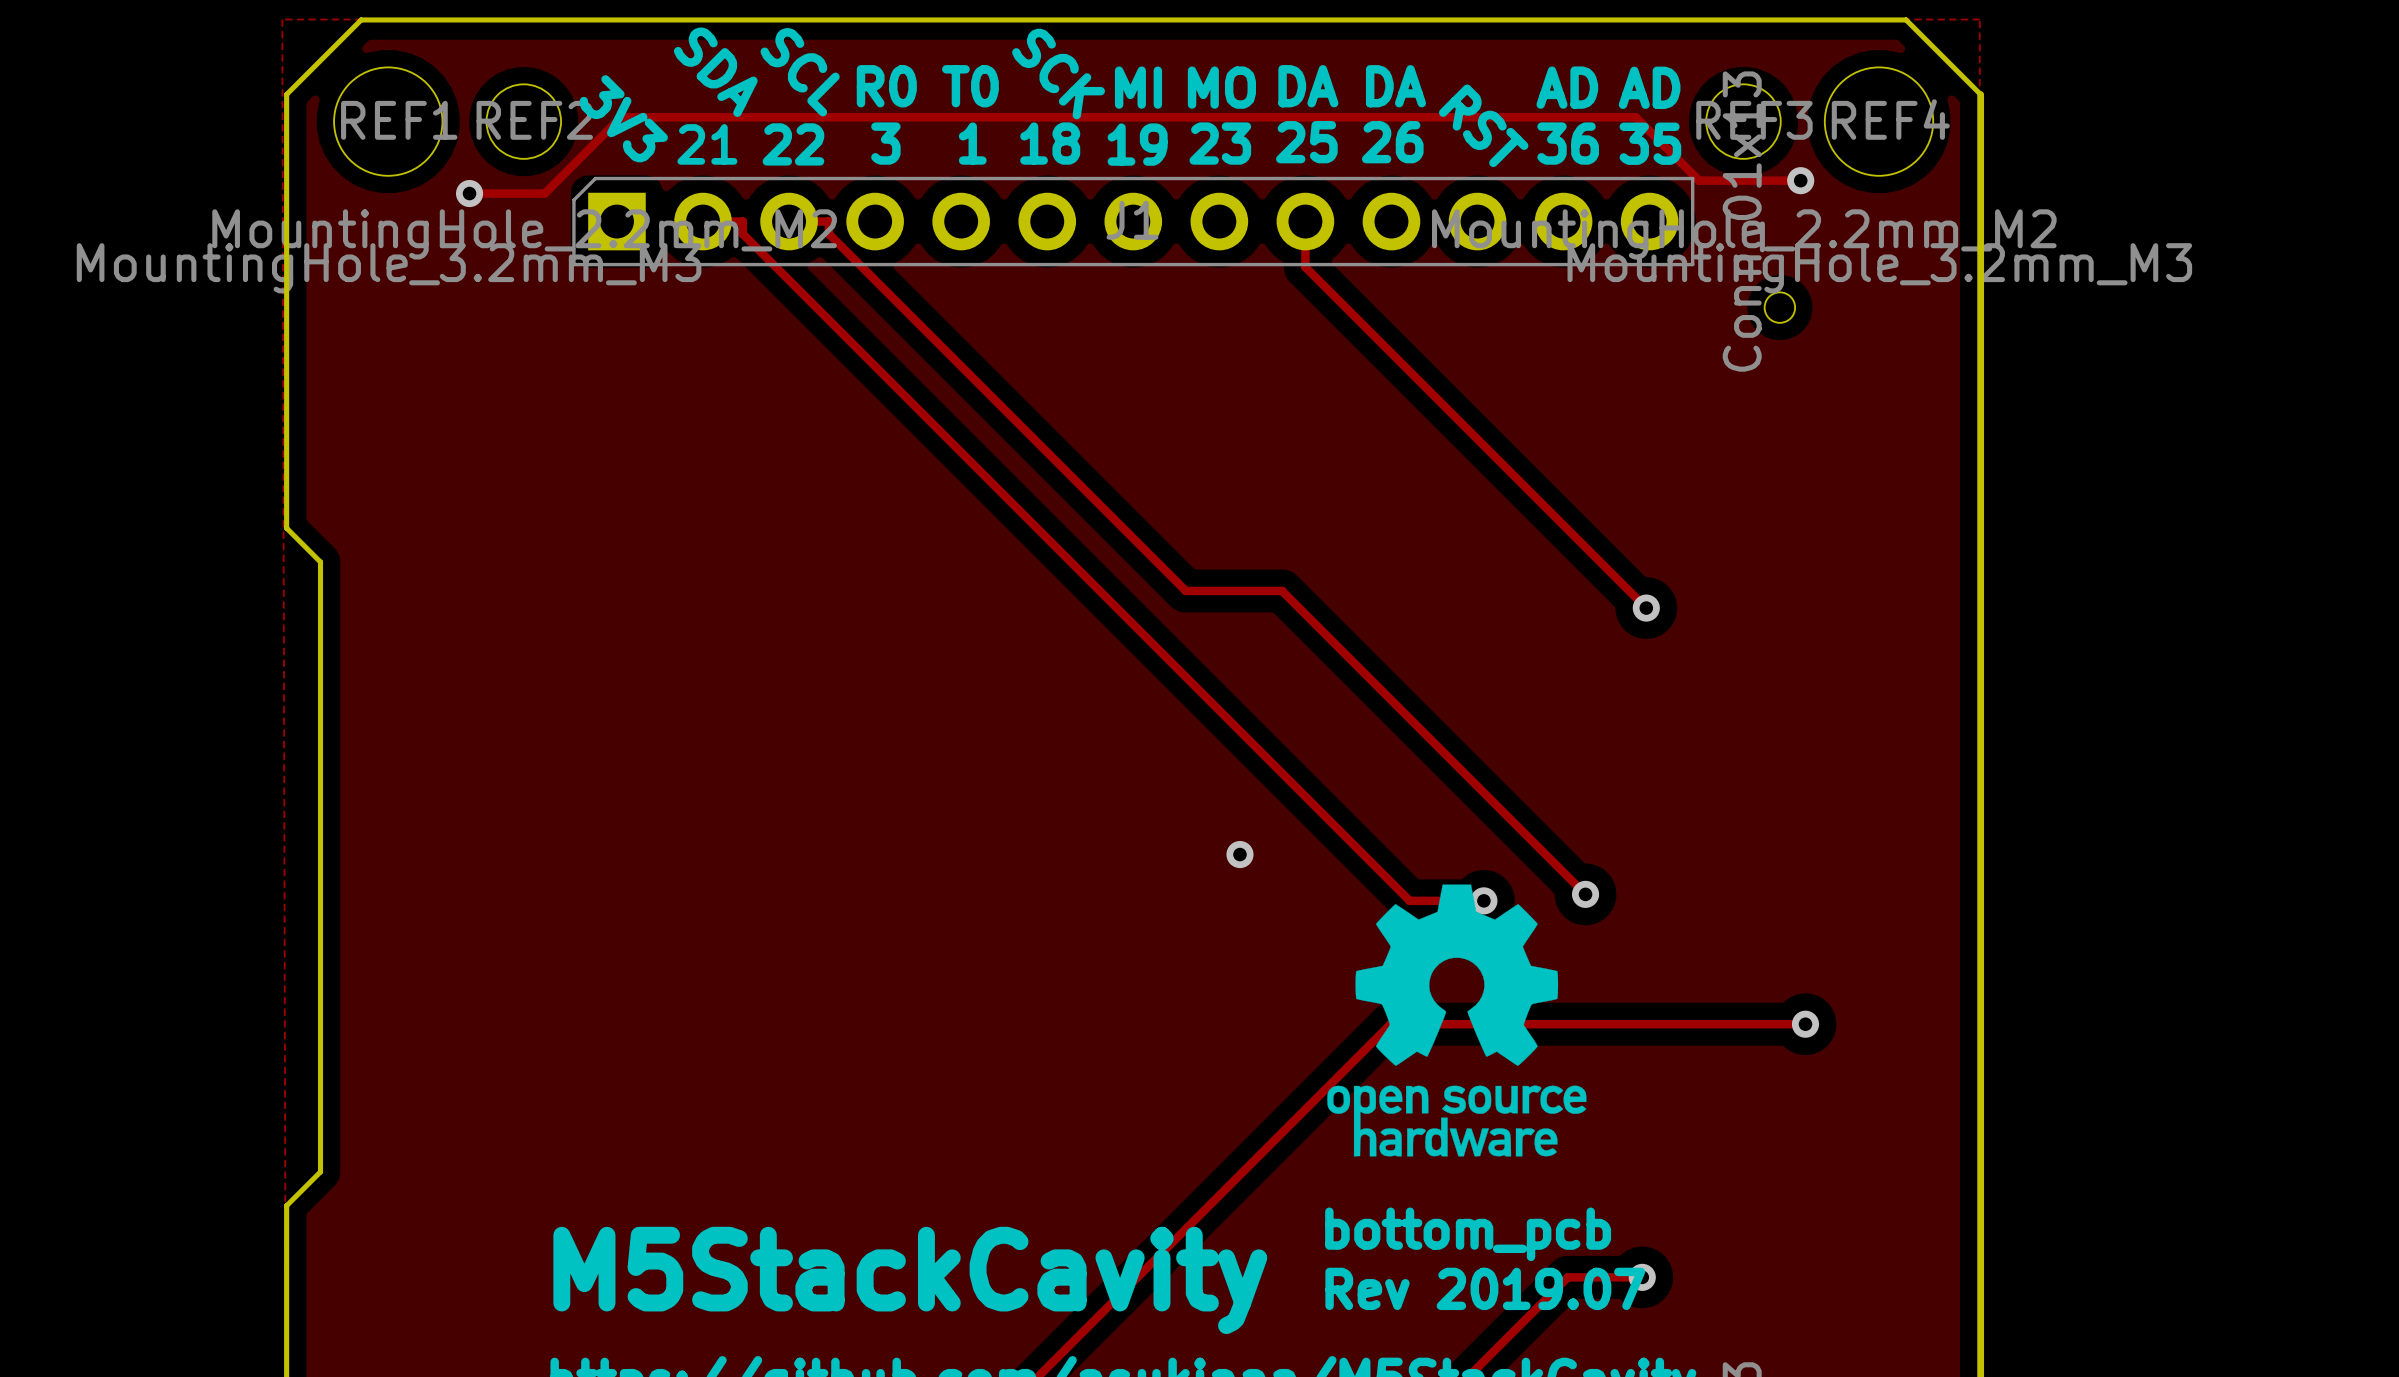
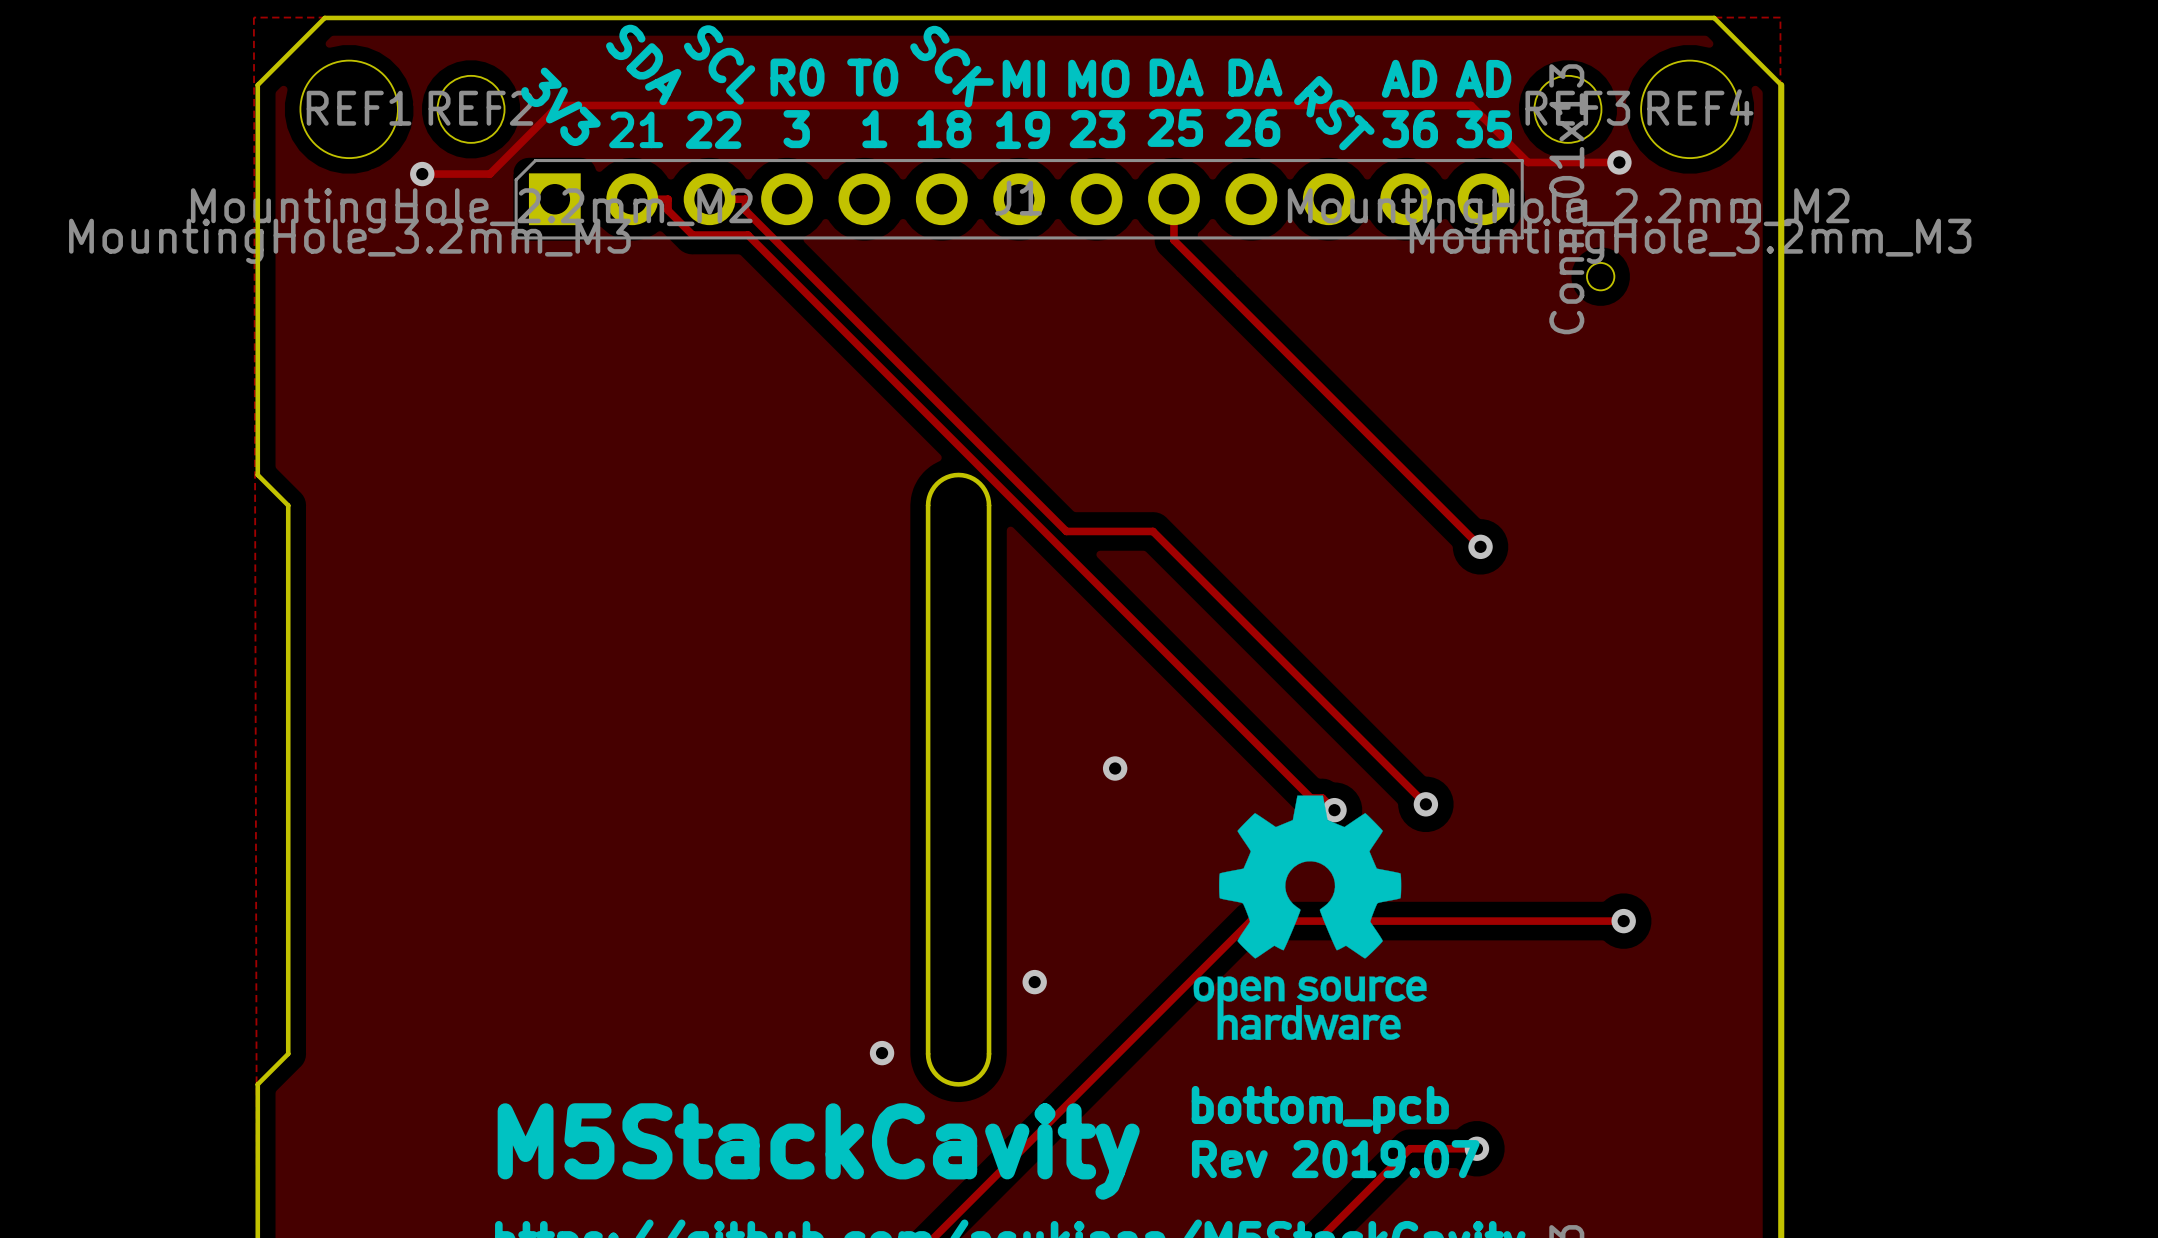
track: (770, 261) (1409, 900) (1483, 900) -> (692, 235) (747, 235) (1310, 797) (1322, 797) (1334, 810)
drawing: none -> [925, 472, 992, 1087]
via: none -> (1034, 982)
via: none -> (882, 1053)

